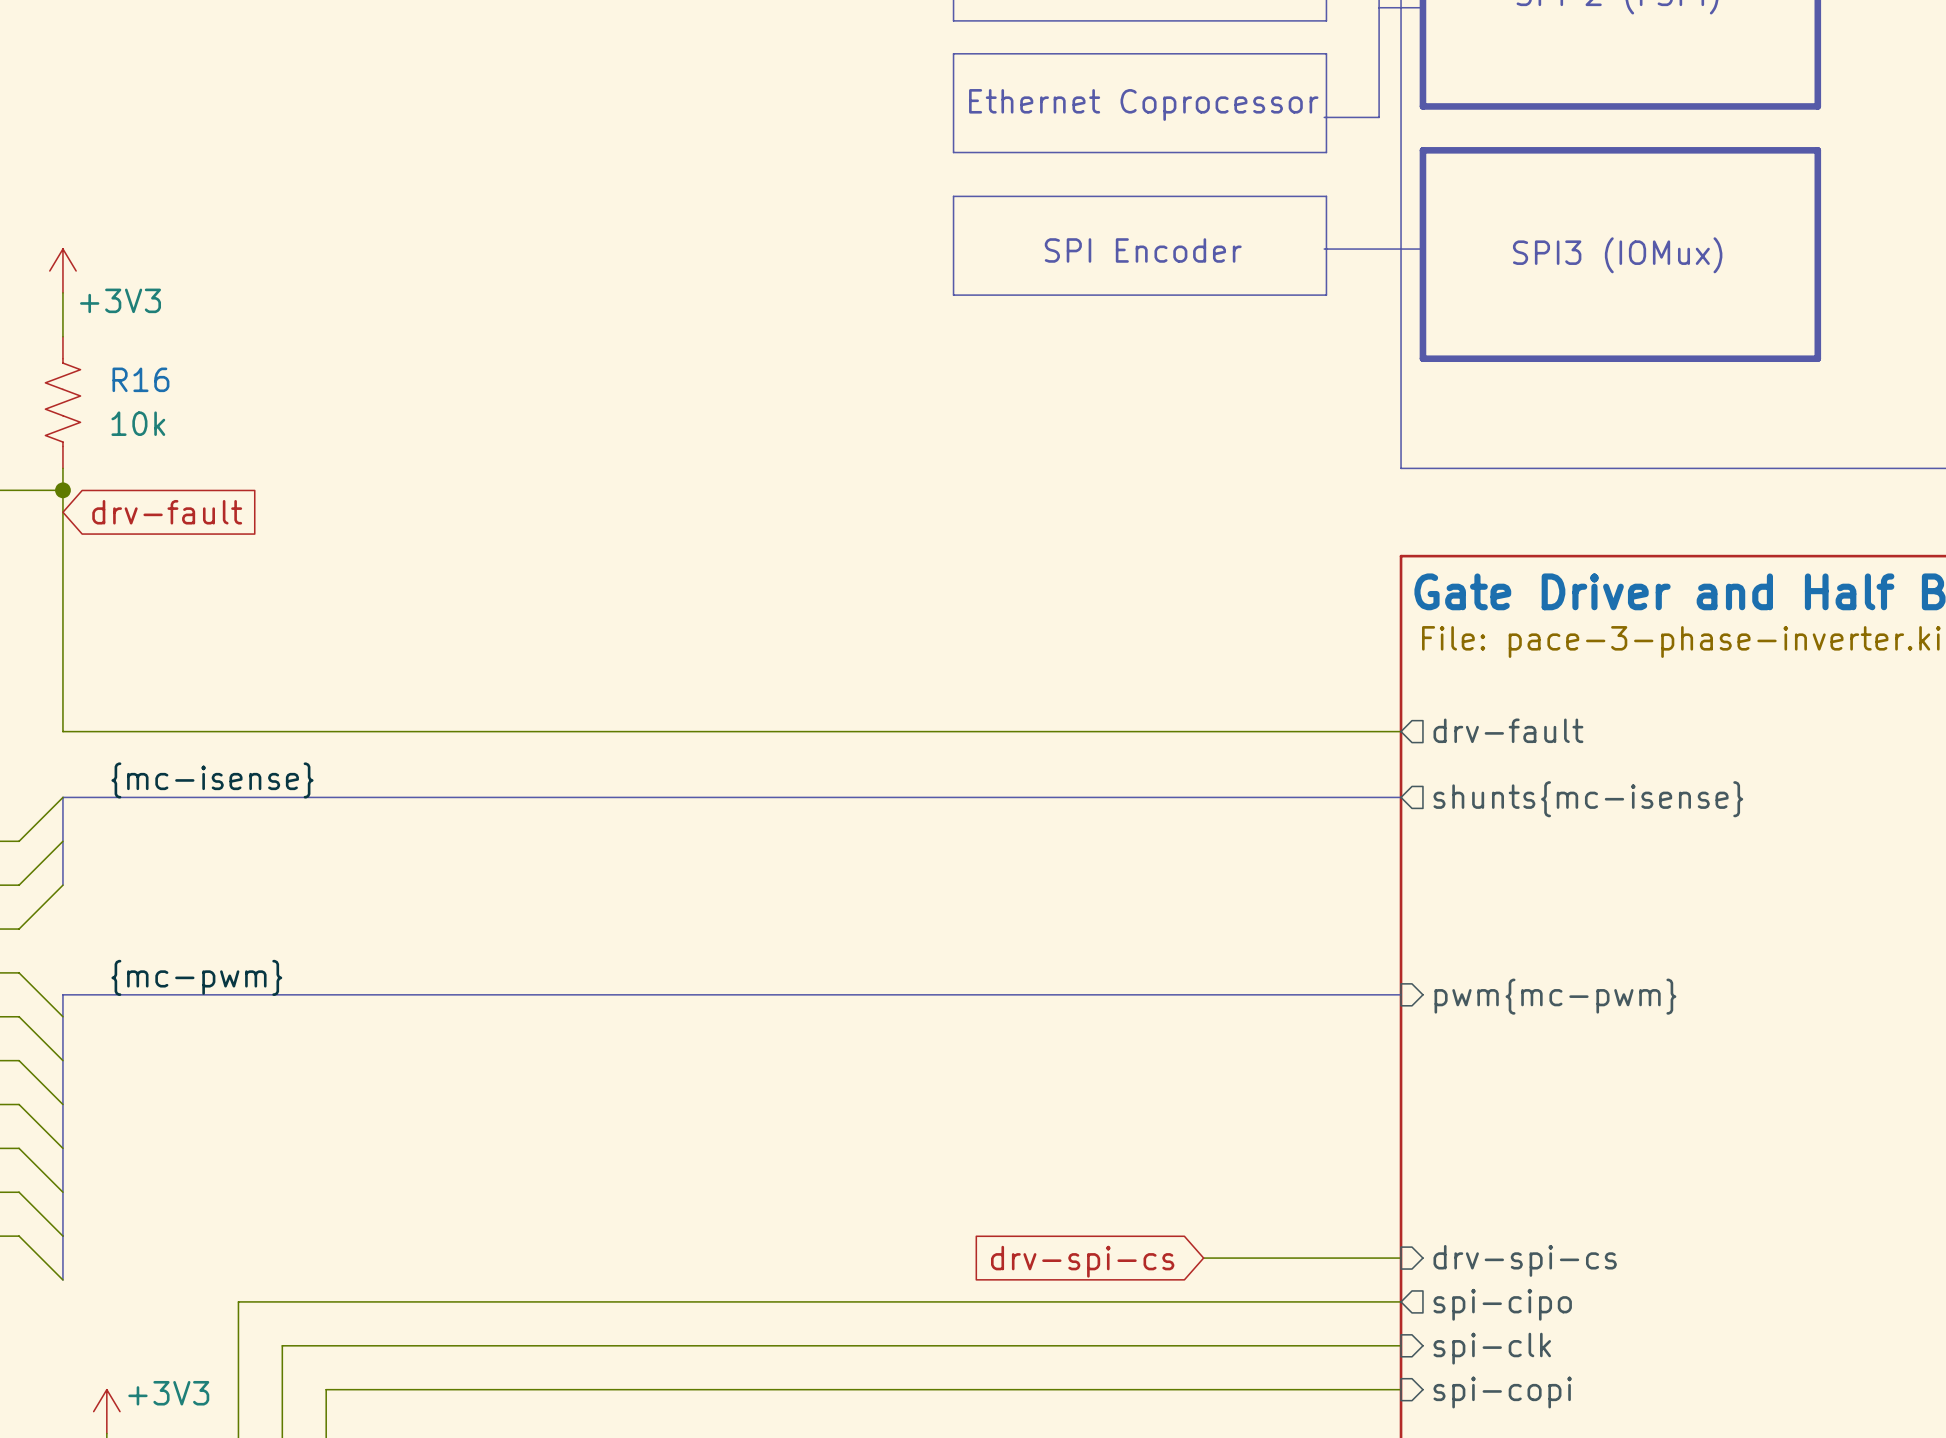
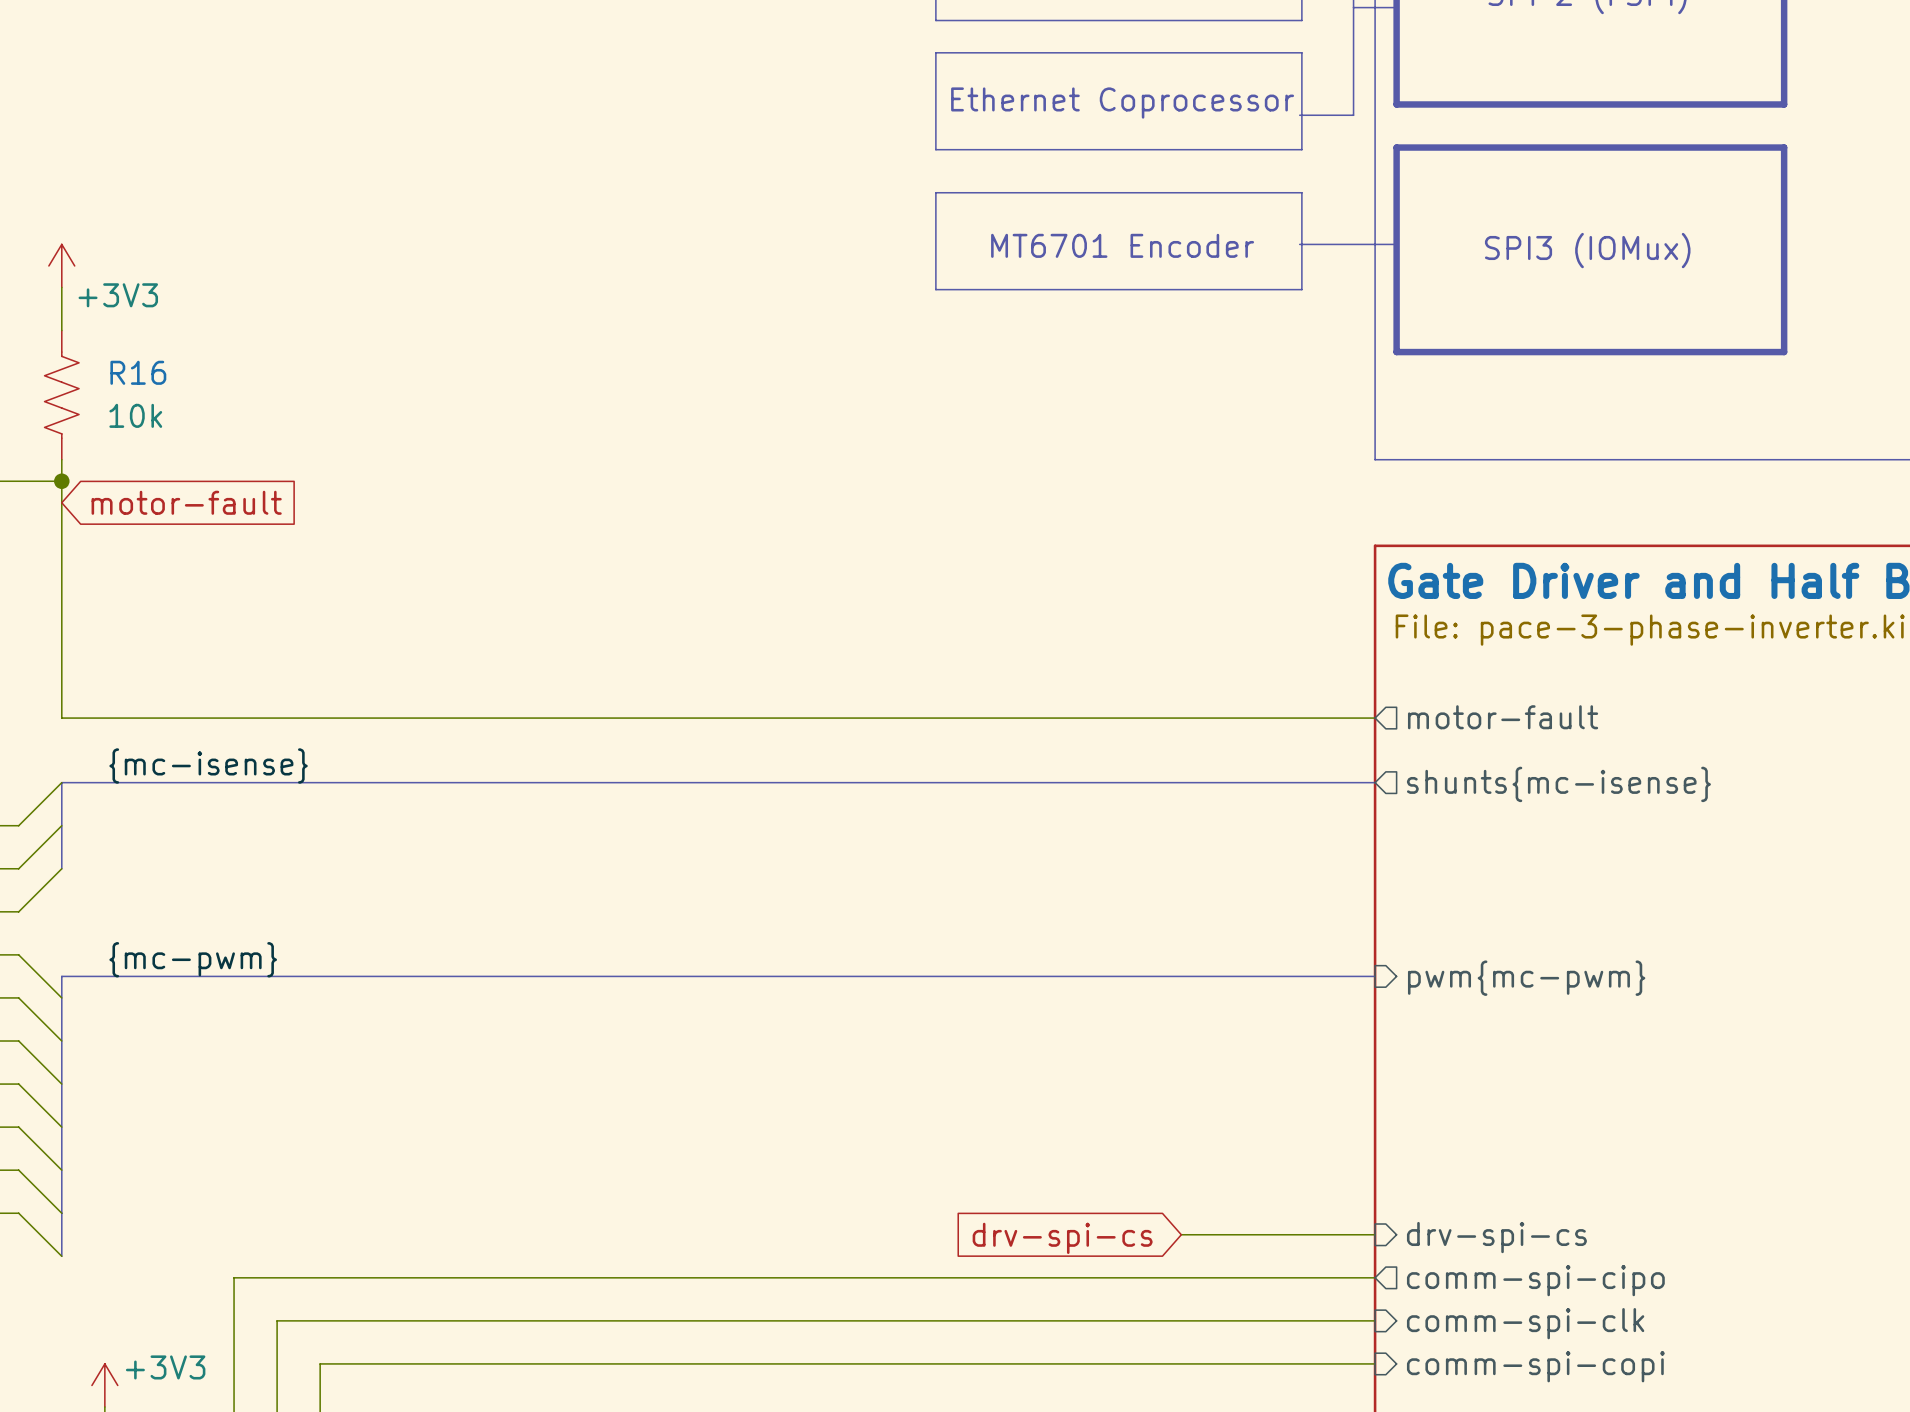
text: SPI Encoder (1143, 250) -> MT6701 Encoder (1122, 245)
global label: drv-fault (167, 512) -> motor-fault (186, 502)
sheet pin: drv-fault (1508, 730) -> motor-fault (1503, 717)
sheet pin: spi-cipo (1502, 1304) -> comm-spi-cipo (1535, 1280)
sheet pin: spi-clk (1492, 1348) -> comm-spi-clk (1525, 1323)
sheet pin: spi-copi (1502, 1392) -> comm-spi-copi (1535, 1366)

